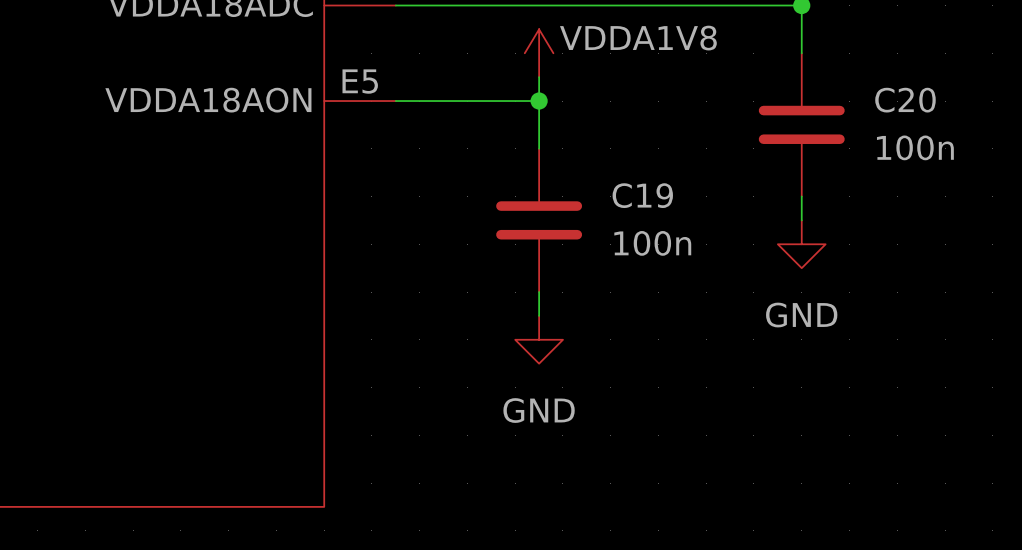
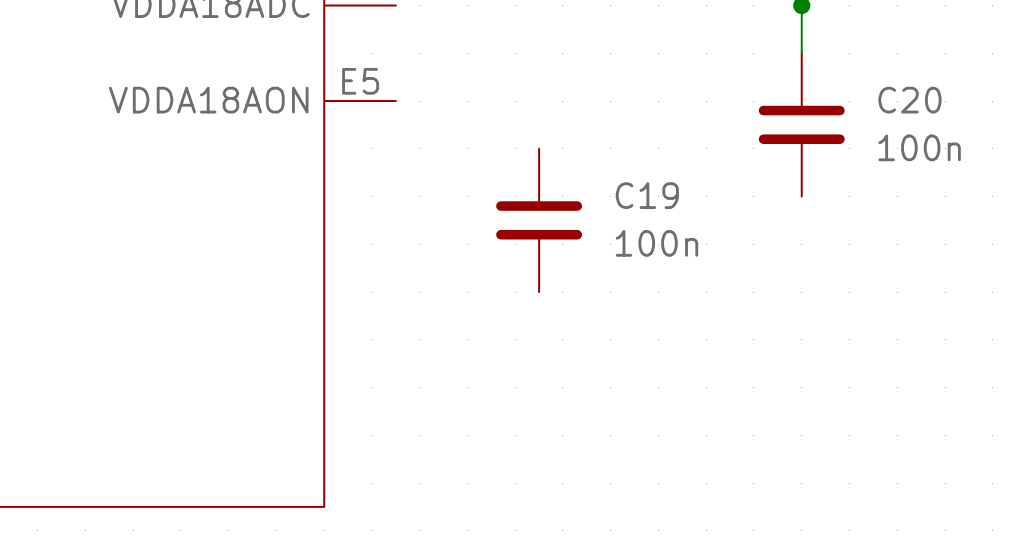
wire: (395, 5) (801, 5) -> none
power symbol: VDDA1V8 (539, 53) -> none
wire: (539, 77) (539, 148) -> none
wire: (395, 101) (539, 101) -> none
junction: (539, 101) -> none
wire: (801, 196) (801, 220) -> none
power symbol: GND (801, 244) -> none
wire: (539, 292) (539, 315) -> none
power symbol: GND (539, 339) -> none

